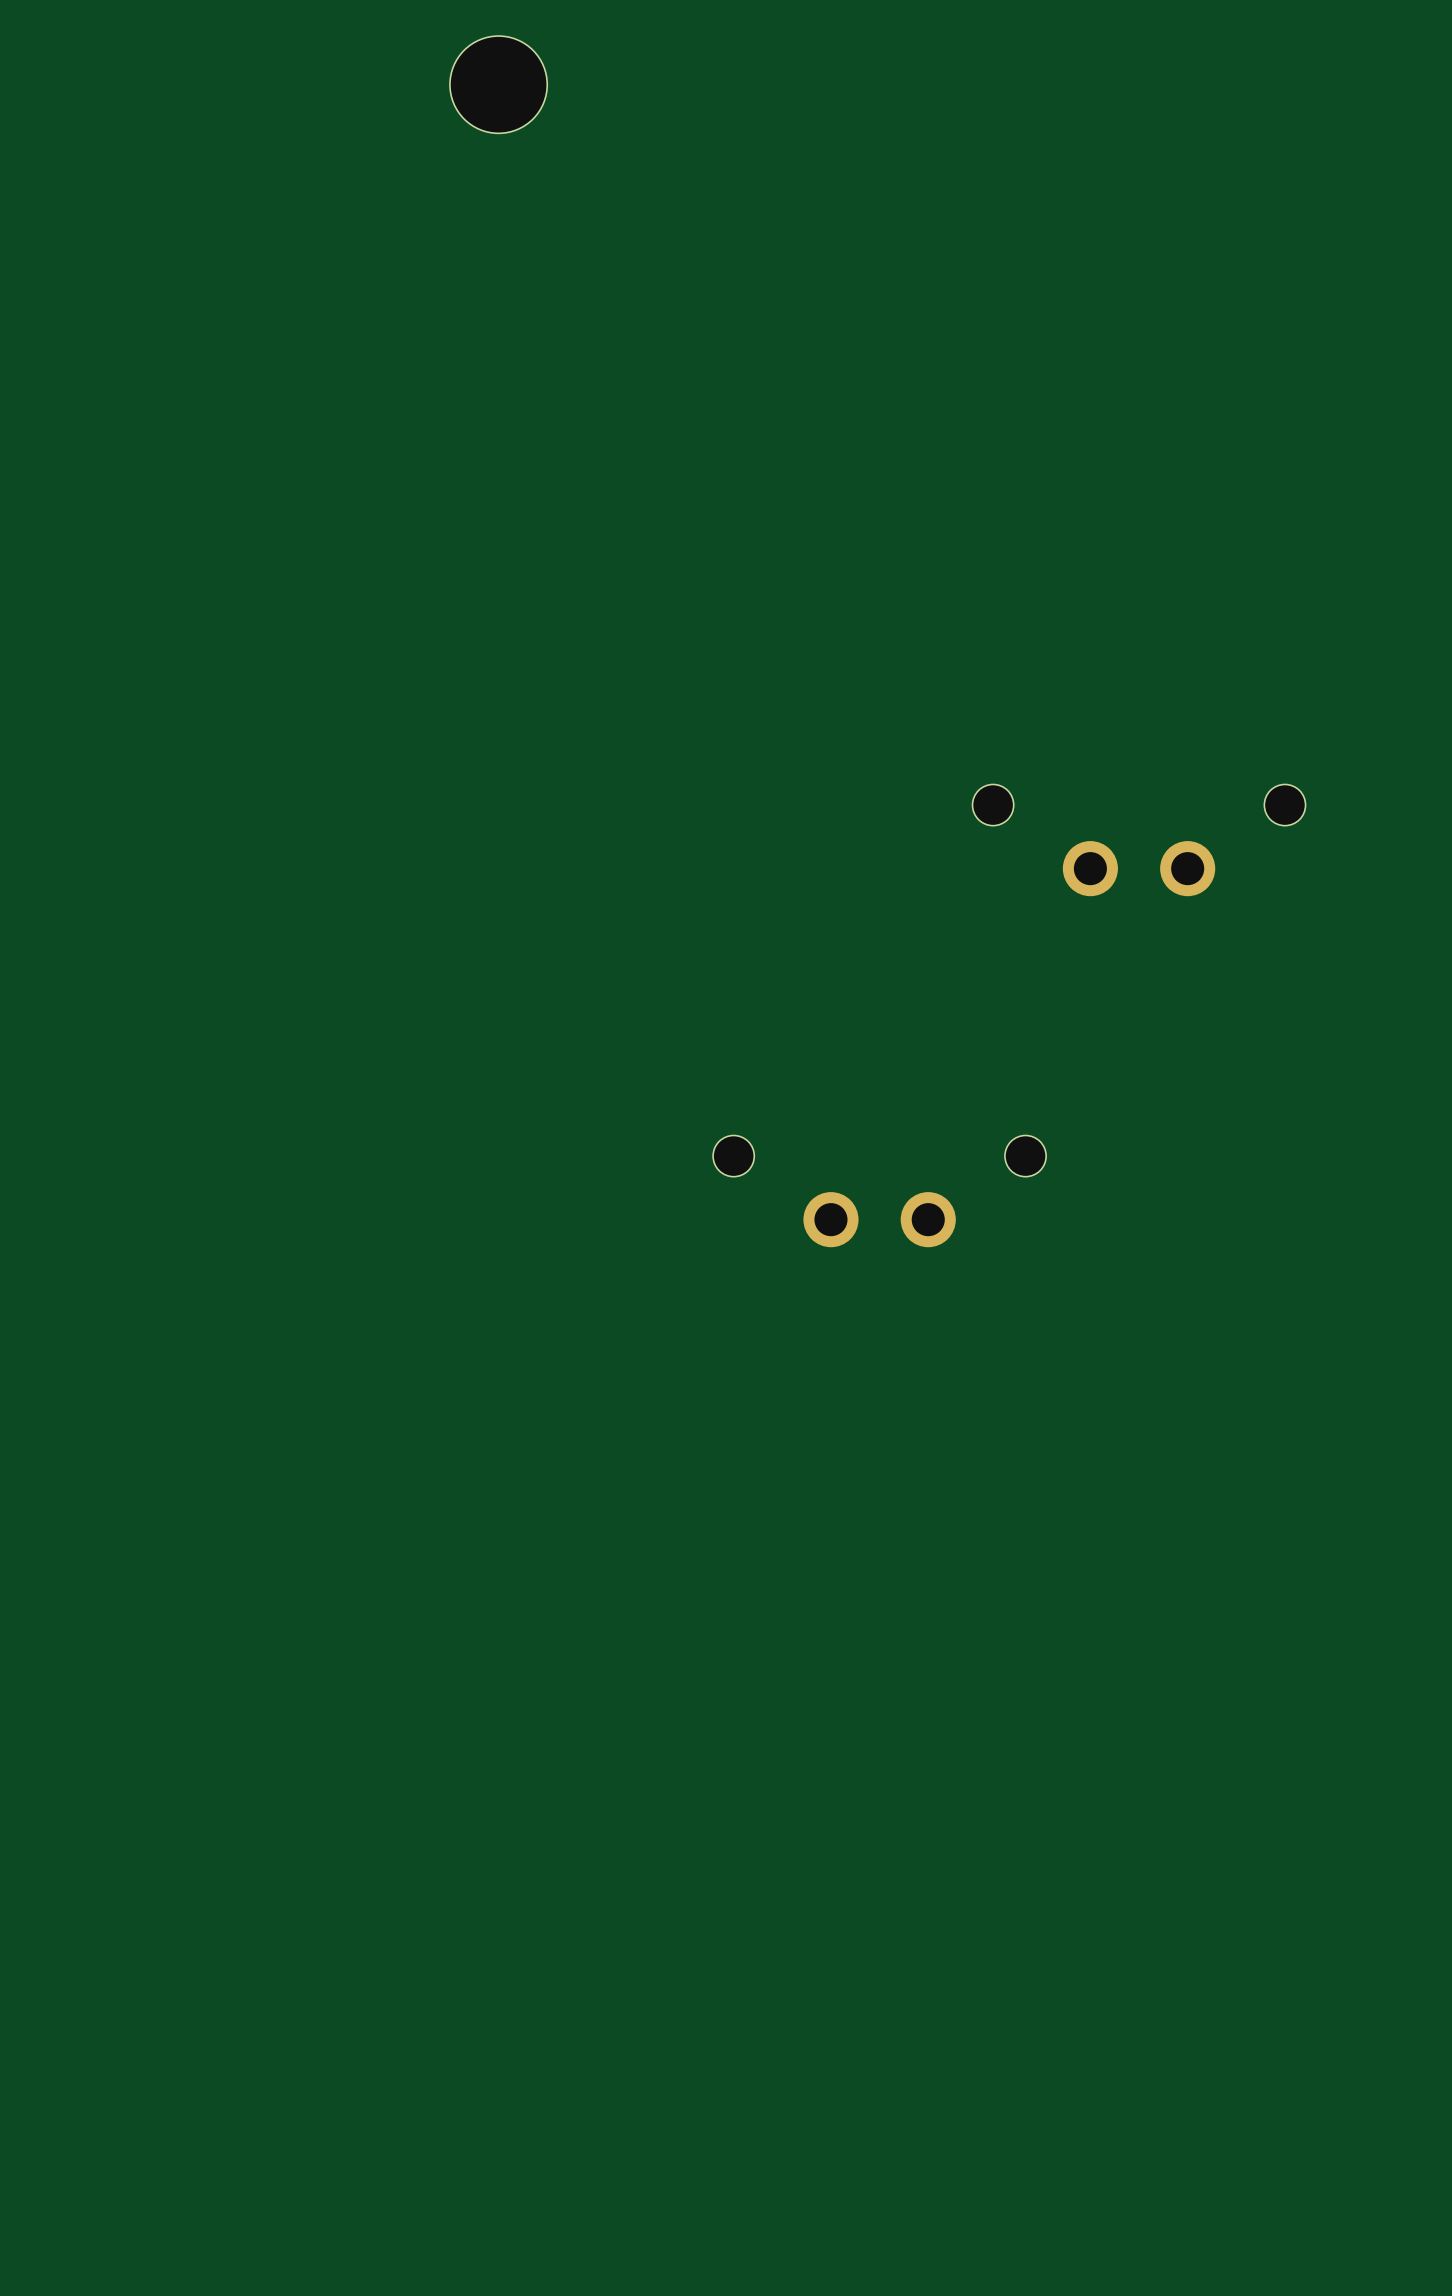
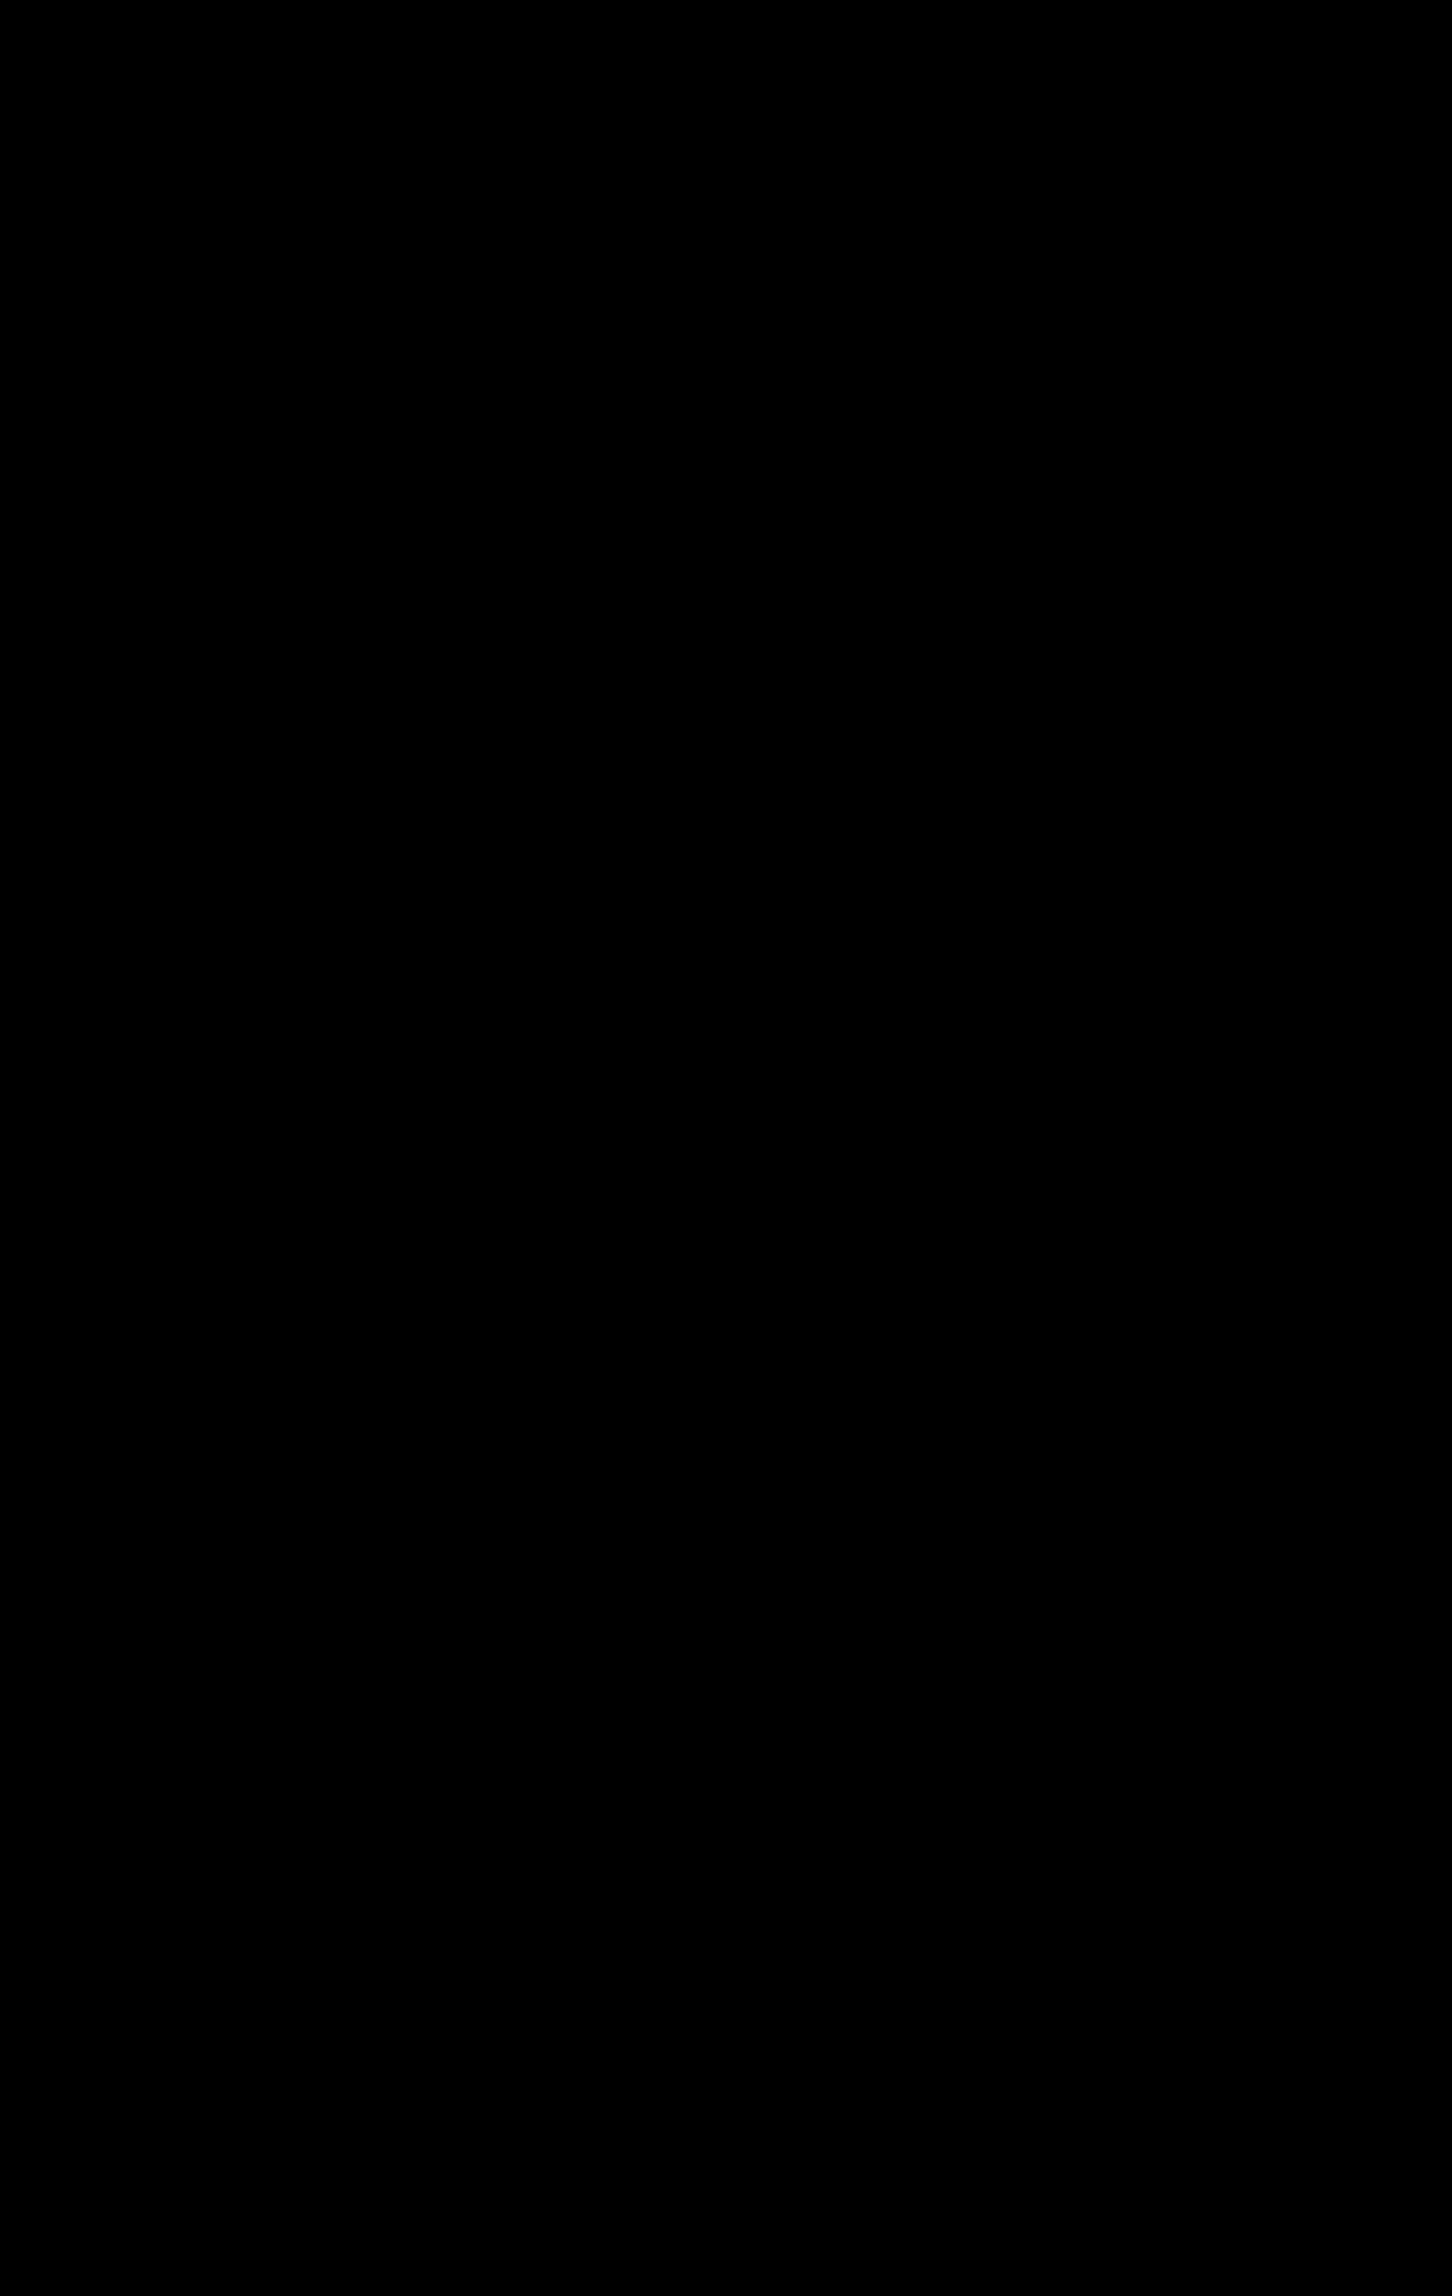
part: (498, 84) -> none
part: (1139, 840) -> none
part: (879, 1191) -> none

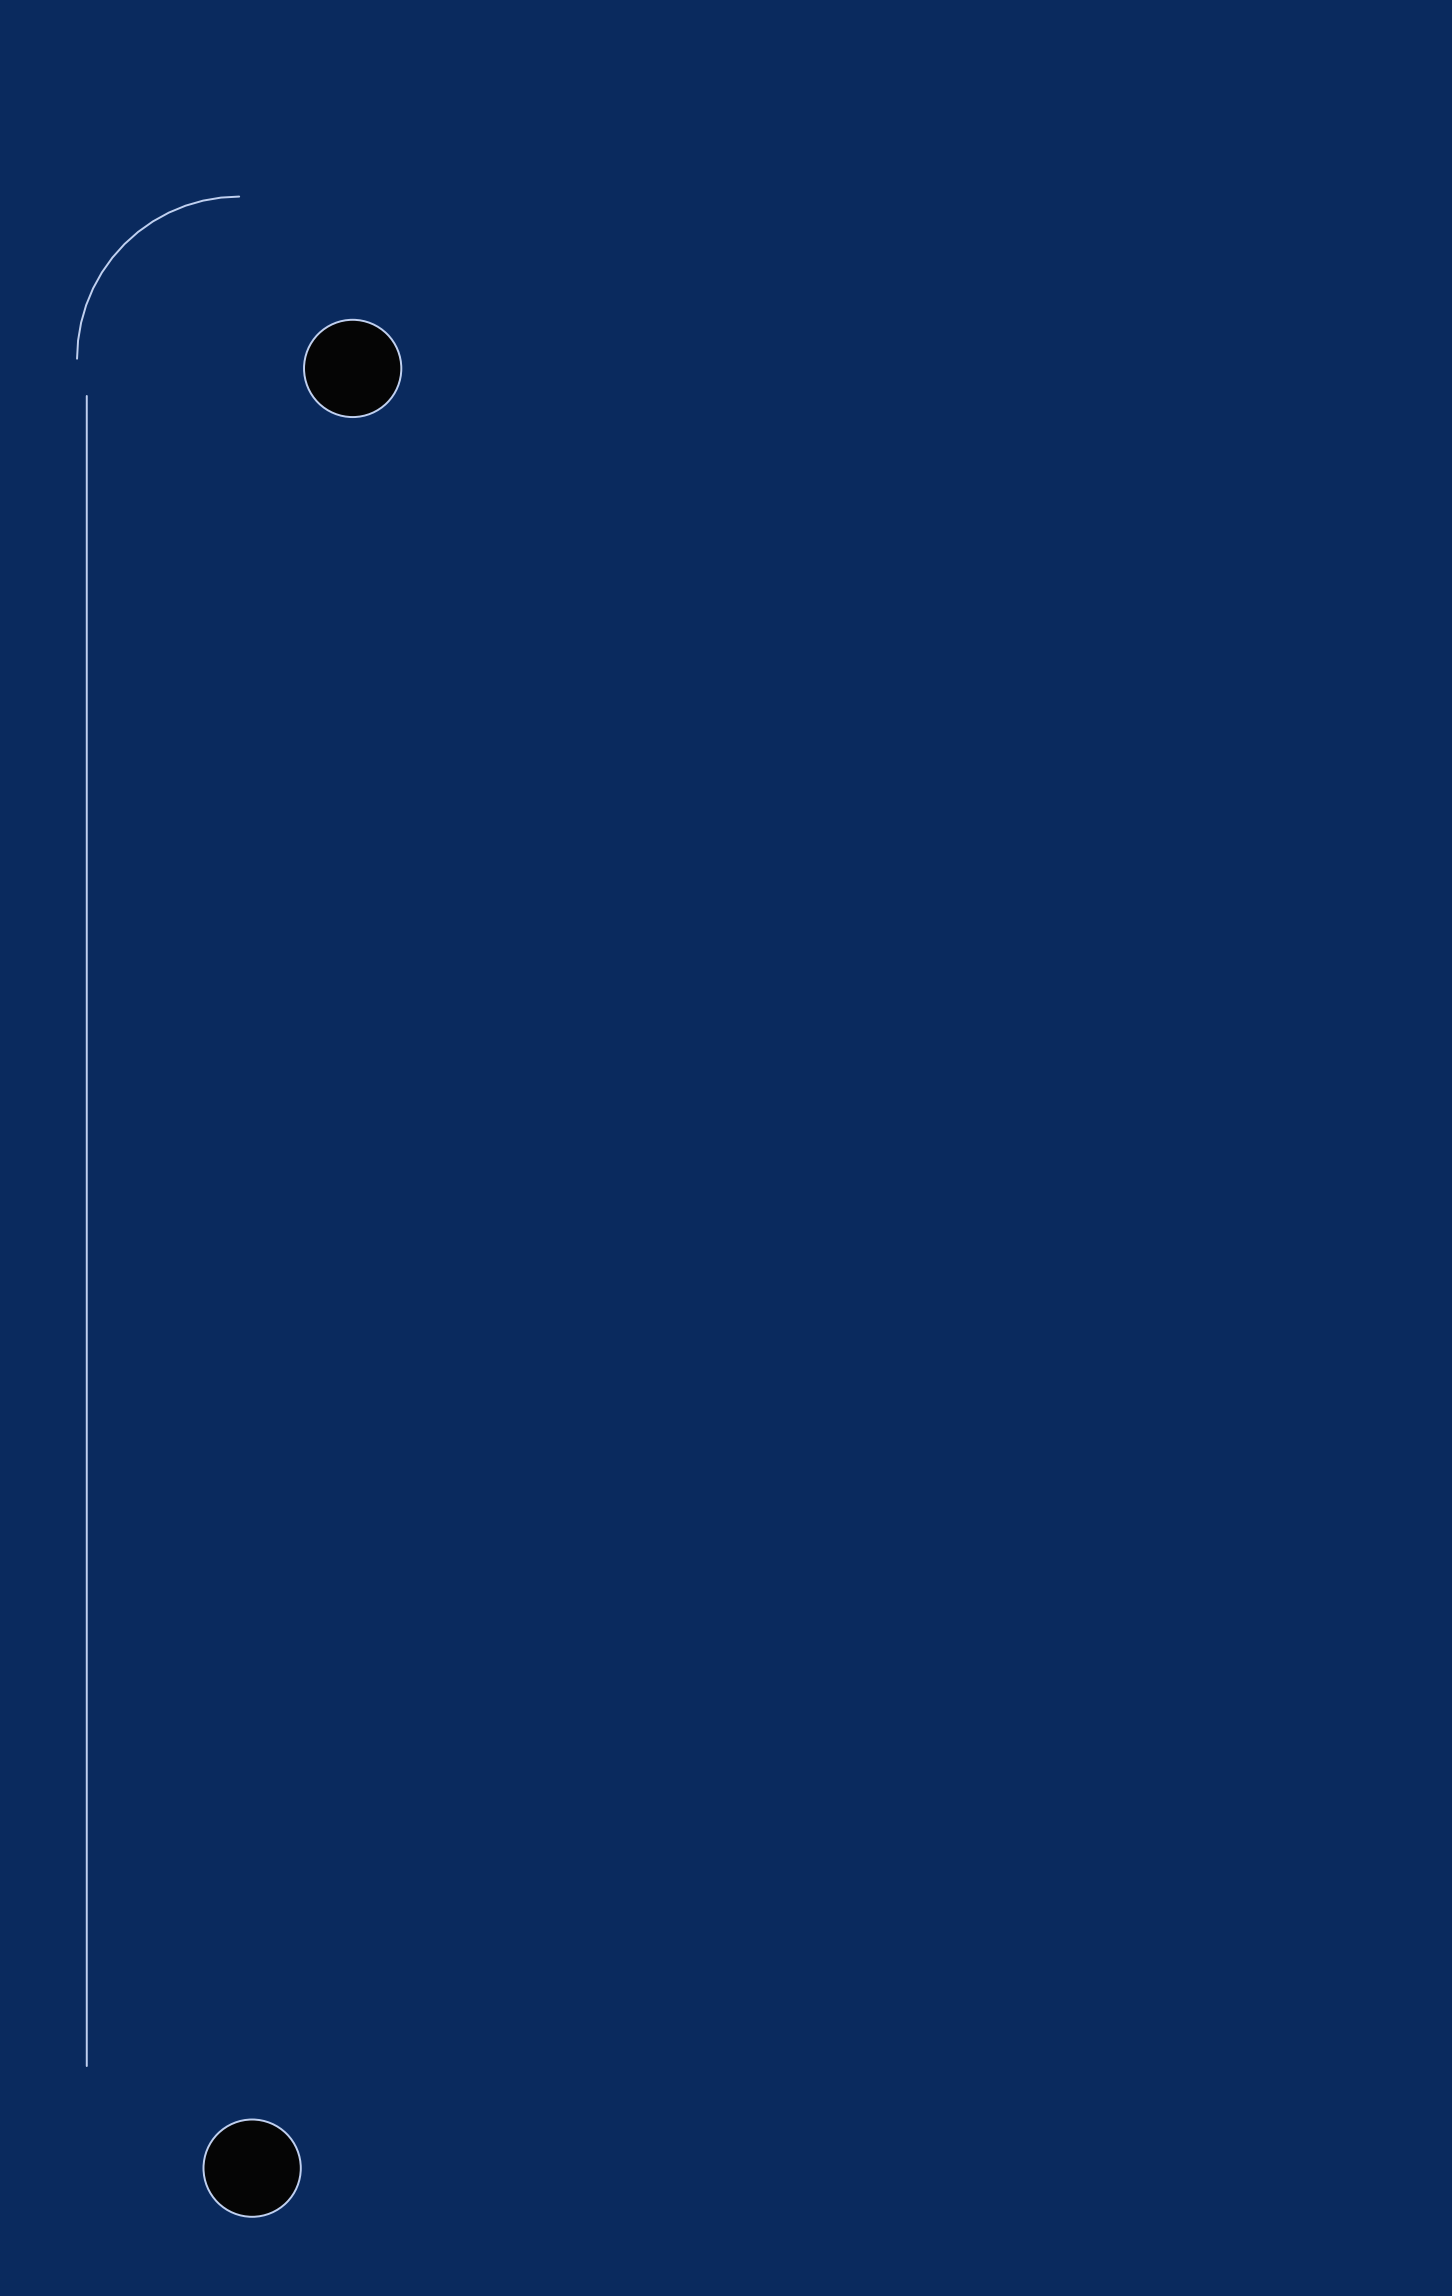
board edge: none -> (239, 196) (203, 200) (185, 205) (152, 221) (124, 244) (101, 272) (86, 305) (78, 340) (77, 358)
part: none -> (352, 368)
board edge: none -> (86, 395) (86, 2066)
part: none -> (252, 2168)

